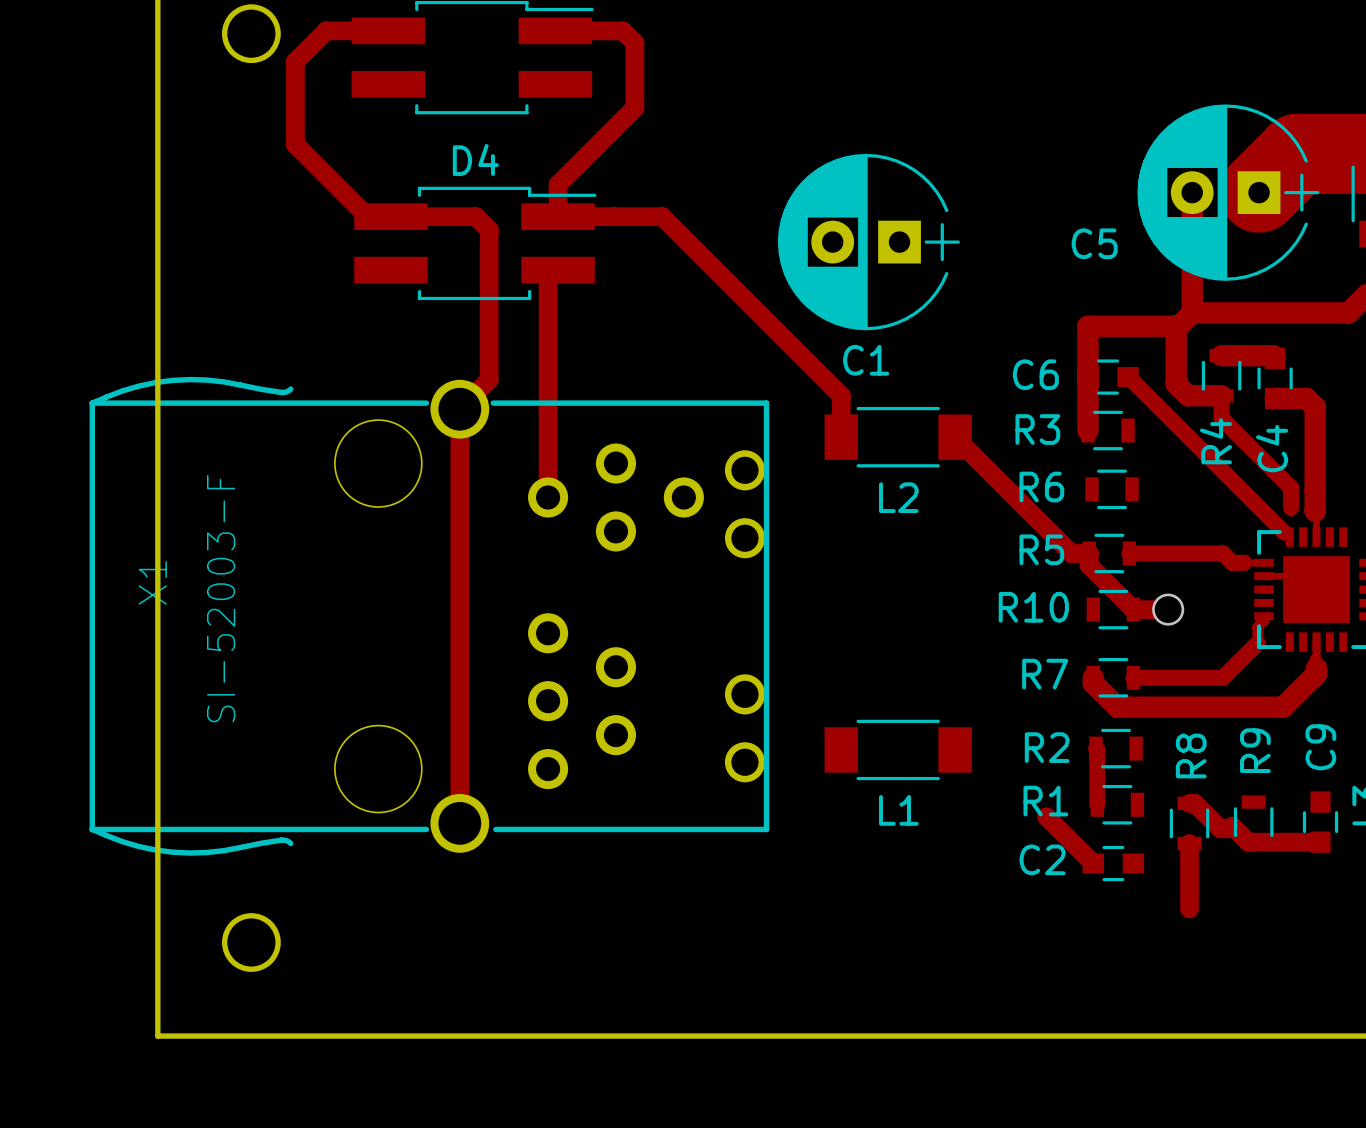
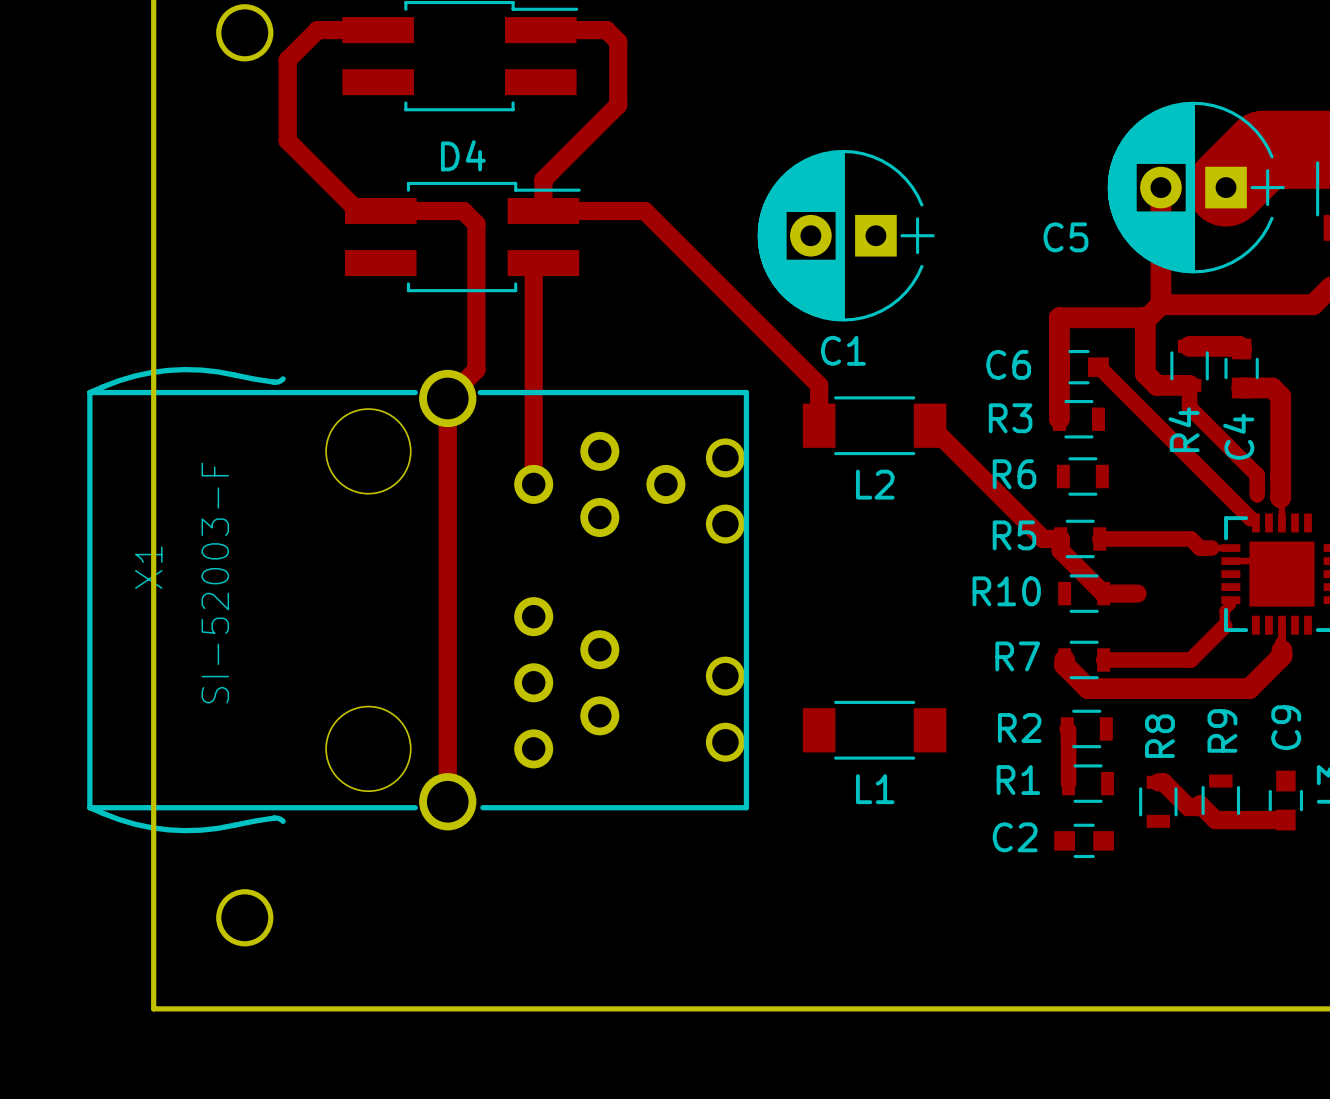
via: (1168, 609) -> none
track: (1046, 816) (1093, 863) -> none
track: (1189, 843) (1189, 908) -> none

